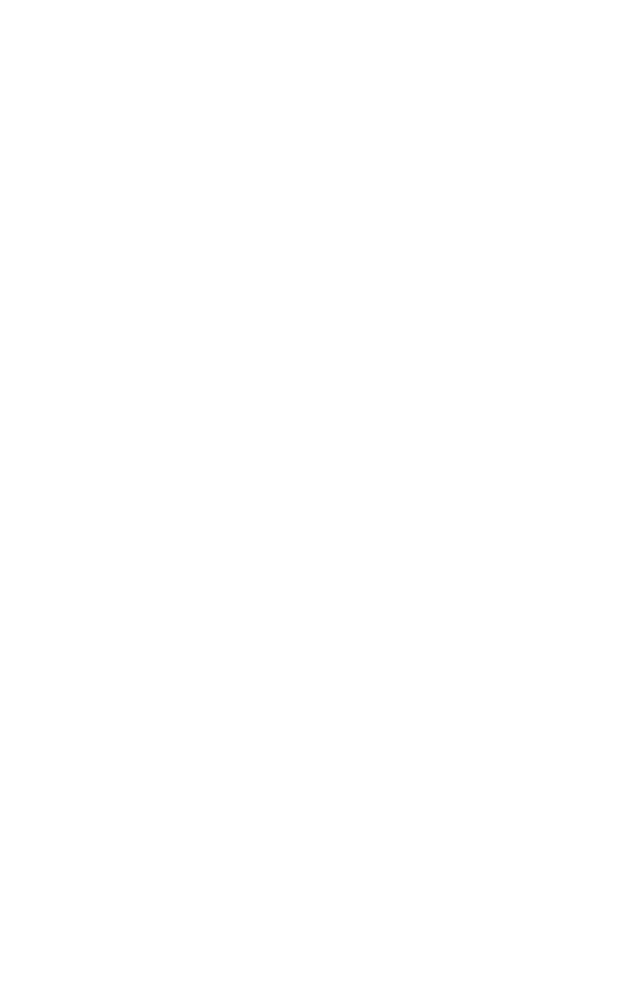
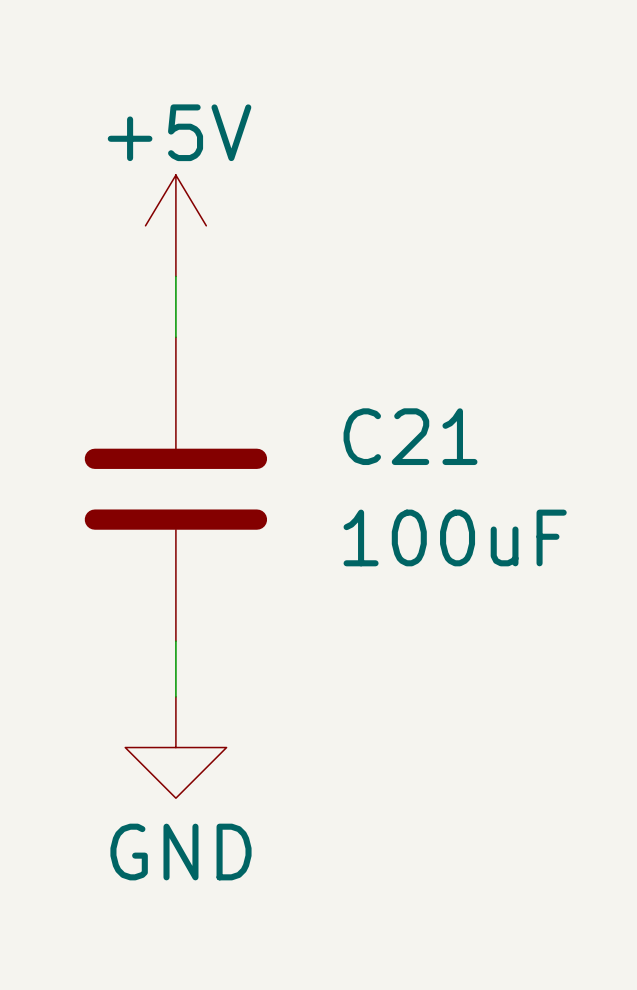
power symbol: none -> +5V (175, 225)
wire: none -> (175, 276) (175, 337)
C21: none -> 100uF (175, 489)
wire: none -> (175, 641) (175, 696)
power symbol: none -> GND (175, 747)

